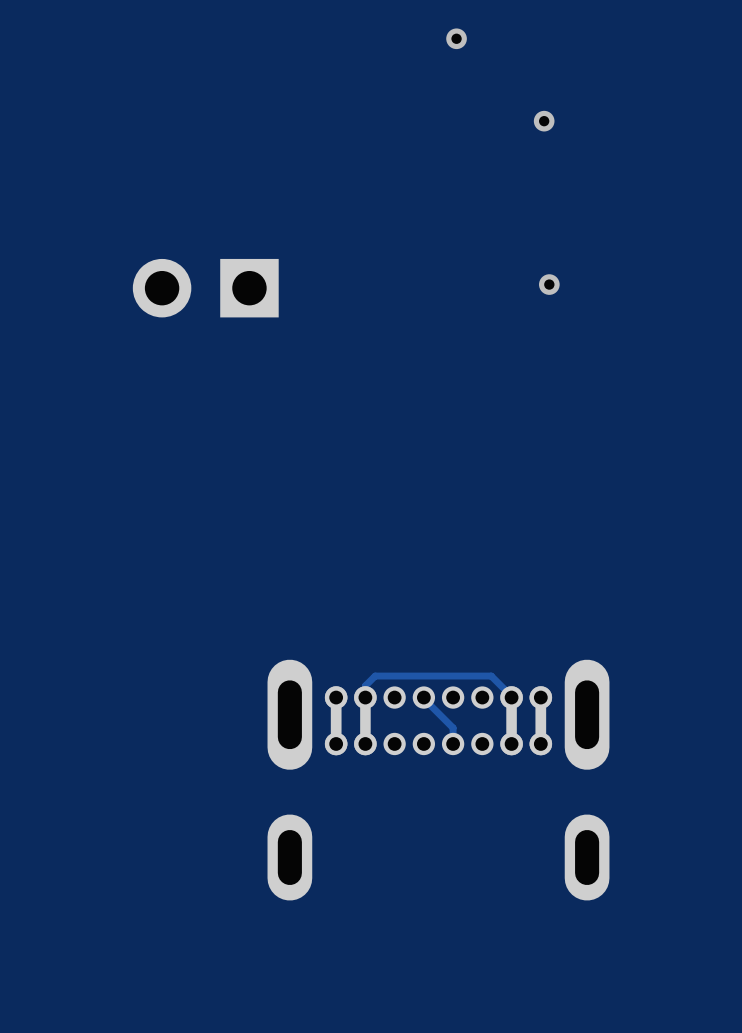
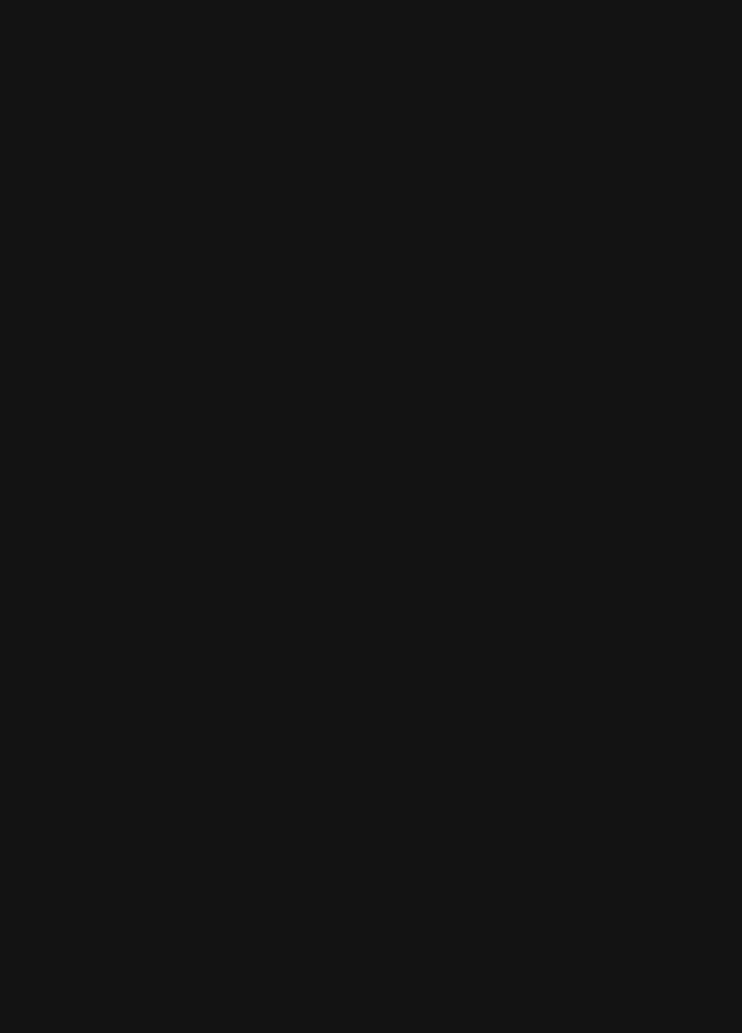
via: (456, 38) -> none
via: (544, 121) -> none
via: (549, 284) -> none
part: (205, 288) -> none
track: (511, 697) (491, 676) (375, 676) (365, 685) (365, 697) -> none
track: (423, 698) (453, 727) (453, 743) -> none
part: (438, 780) -> none

